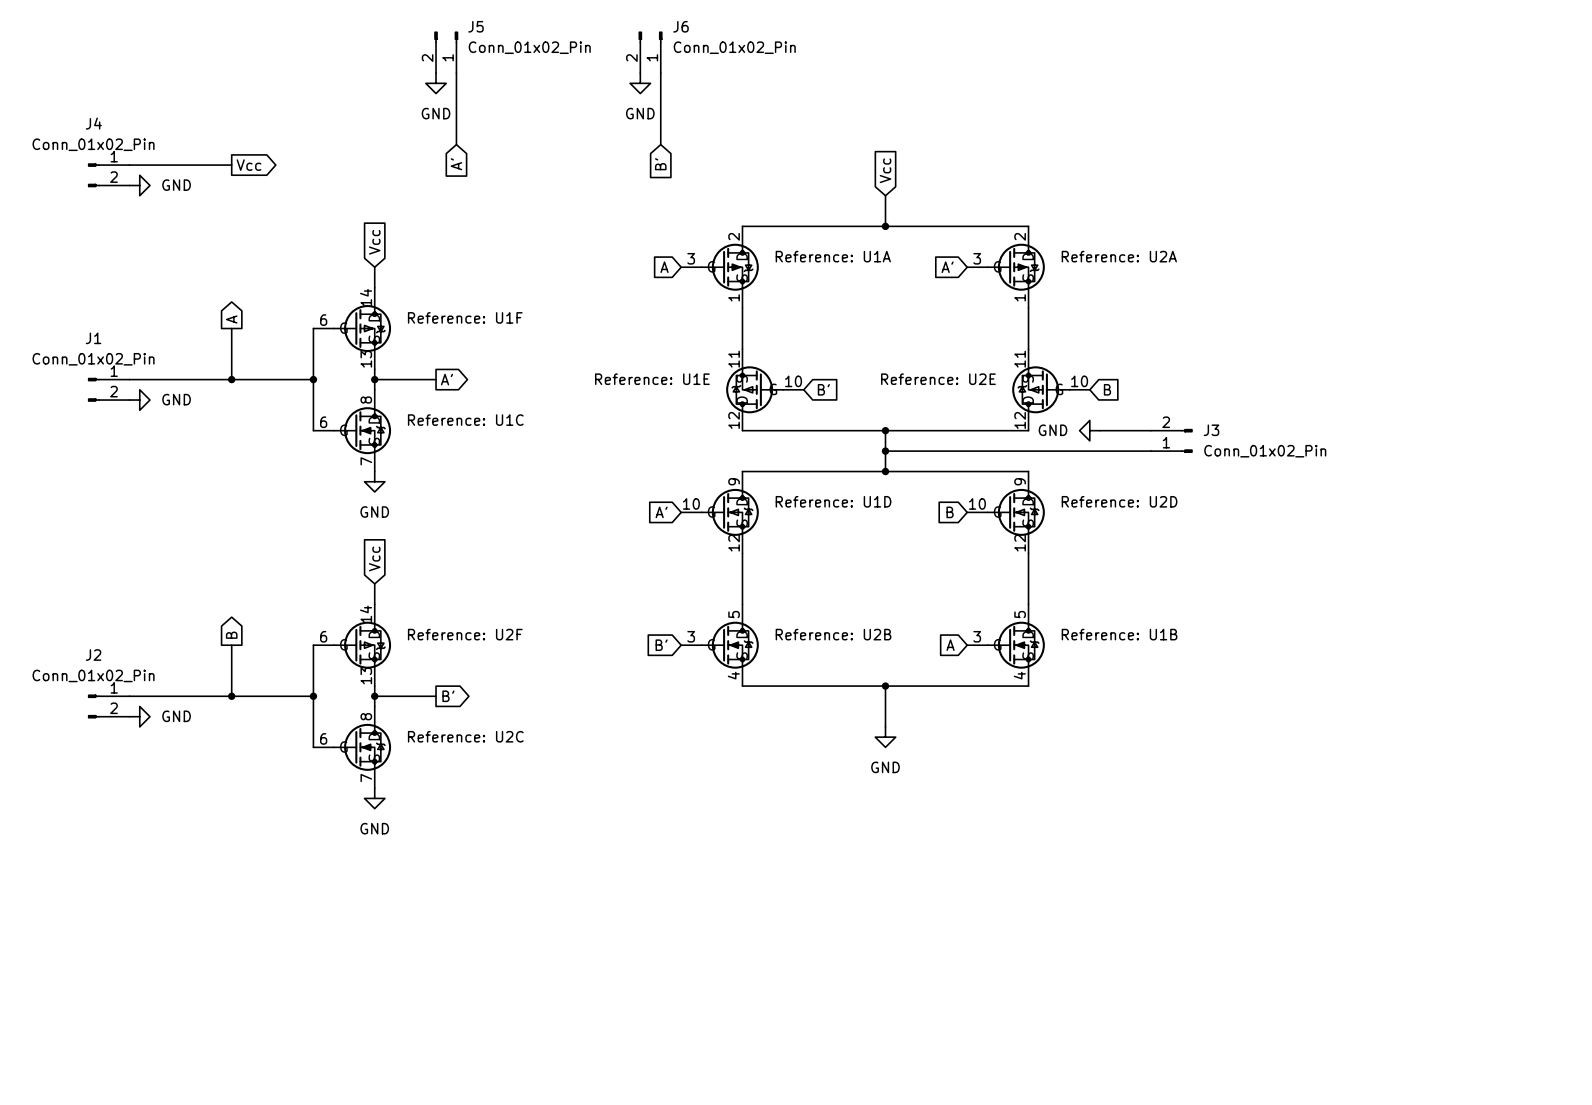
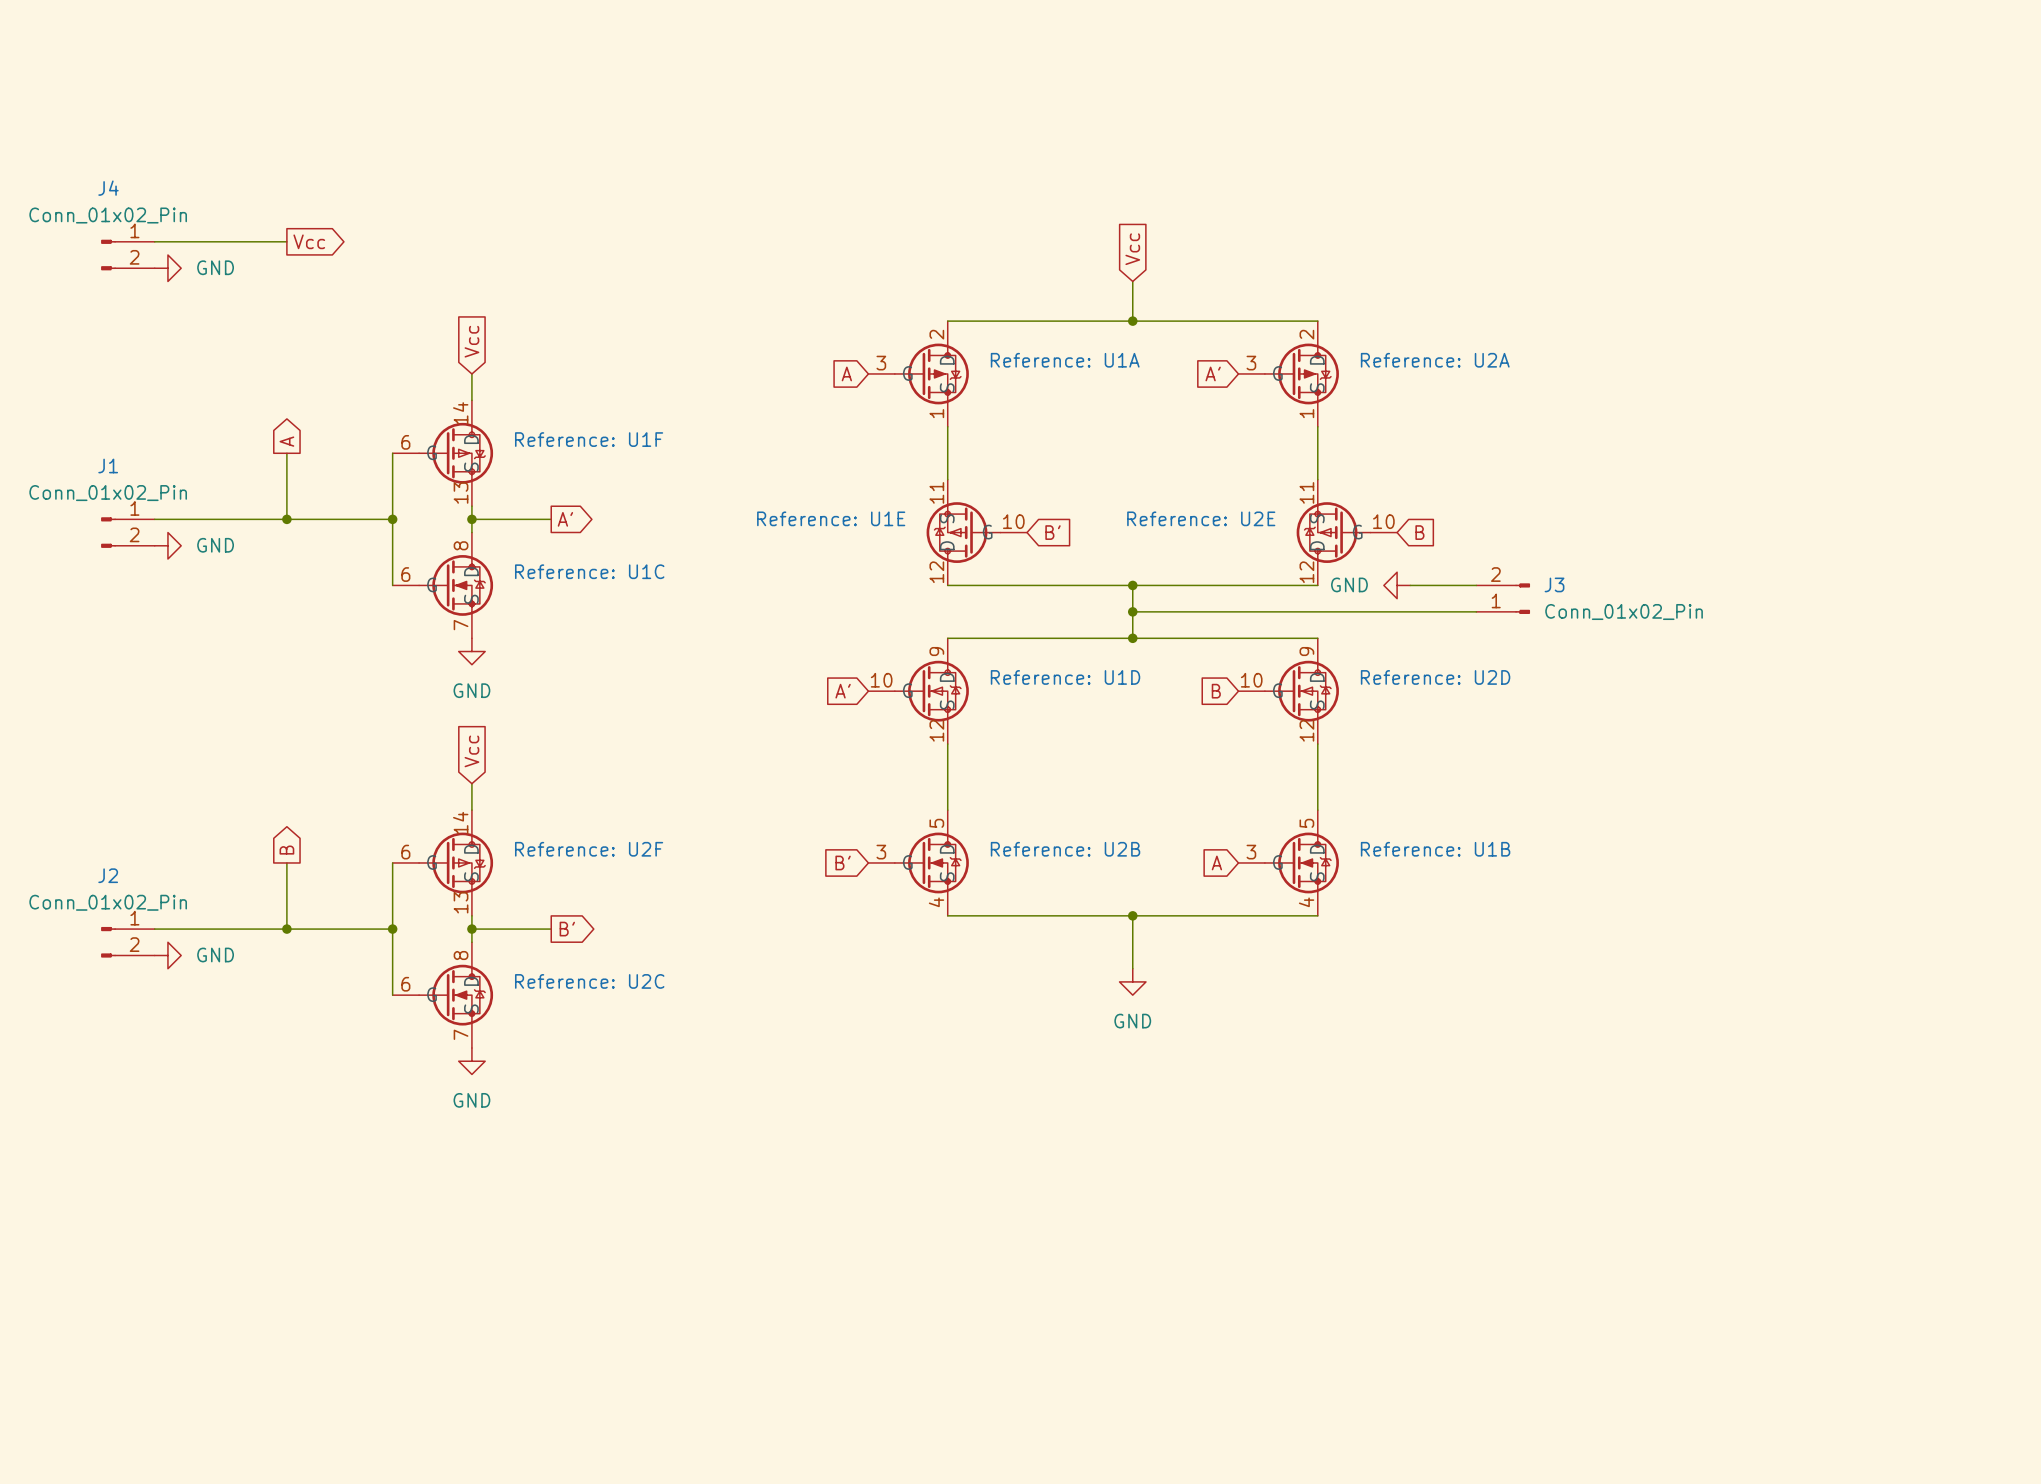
J5: Conn_01x02_Pin (446, 52) -> none
J6: Conn_01x02_Pin (650, 52) -> none
wire: (456, 73) (456, 144) -> none
wire: (660, 73) (660, 144) -> none
power symbol: GND (436, 83) -> none
power symbol: GND (640, 83) -> none
global label: A' (456, 164) -> none
global label: B' (660, 164) -> none

